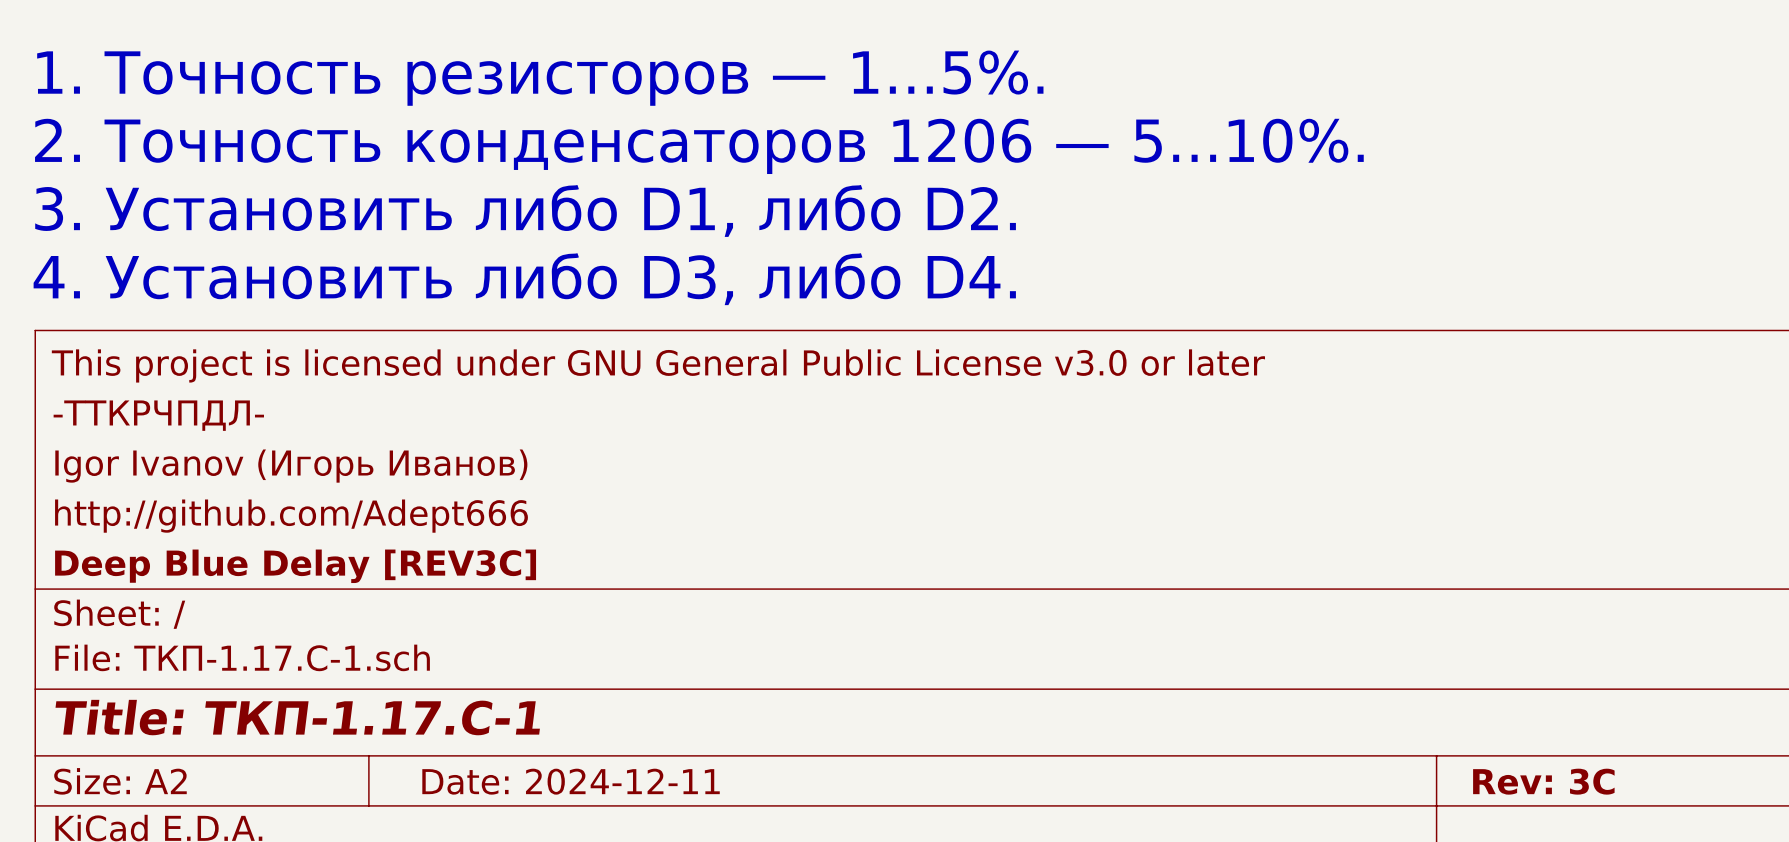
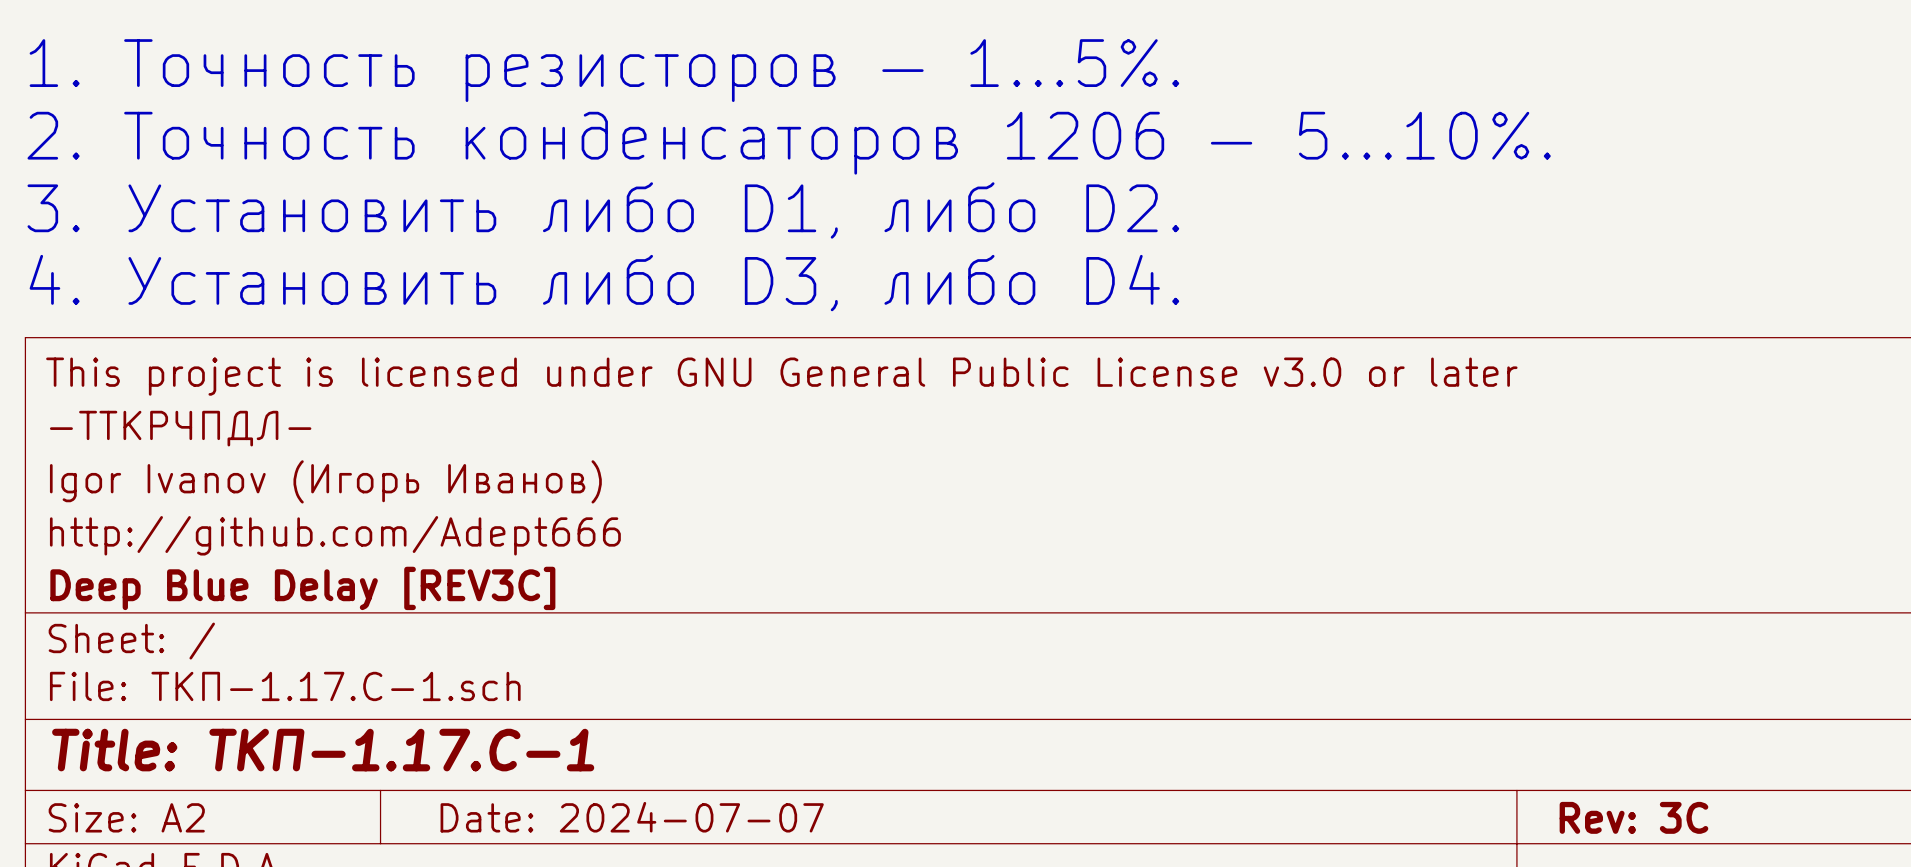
title block: Date: 2024-12-11 (571, 781) -> Date: 2024-07-07 (632, 817)

